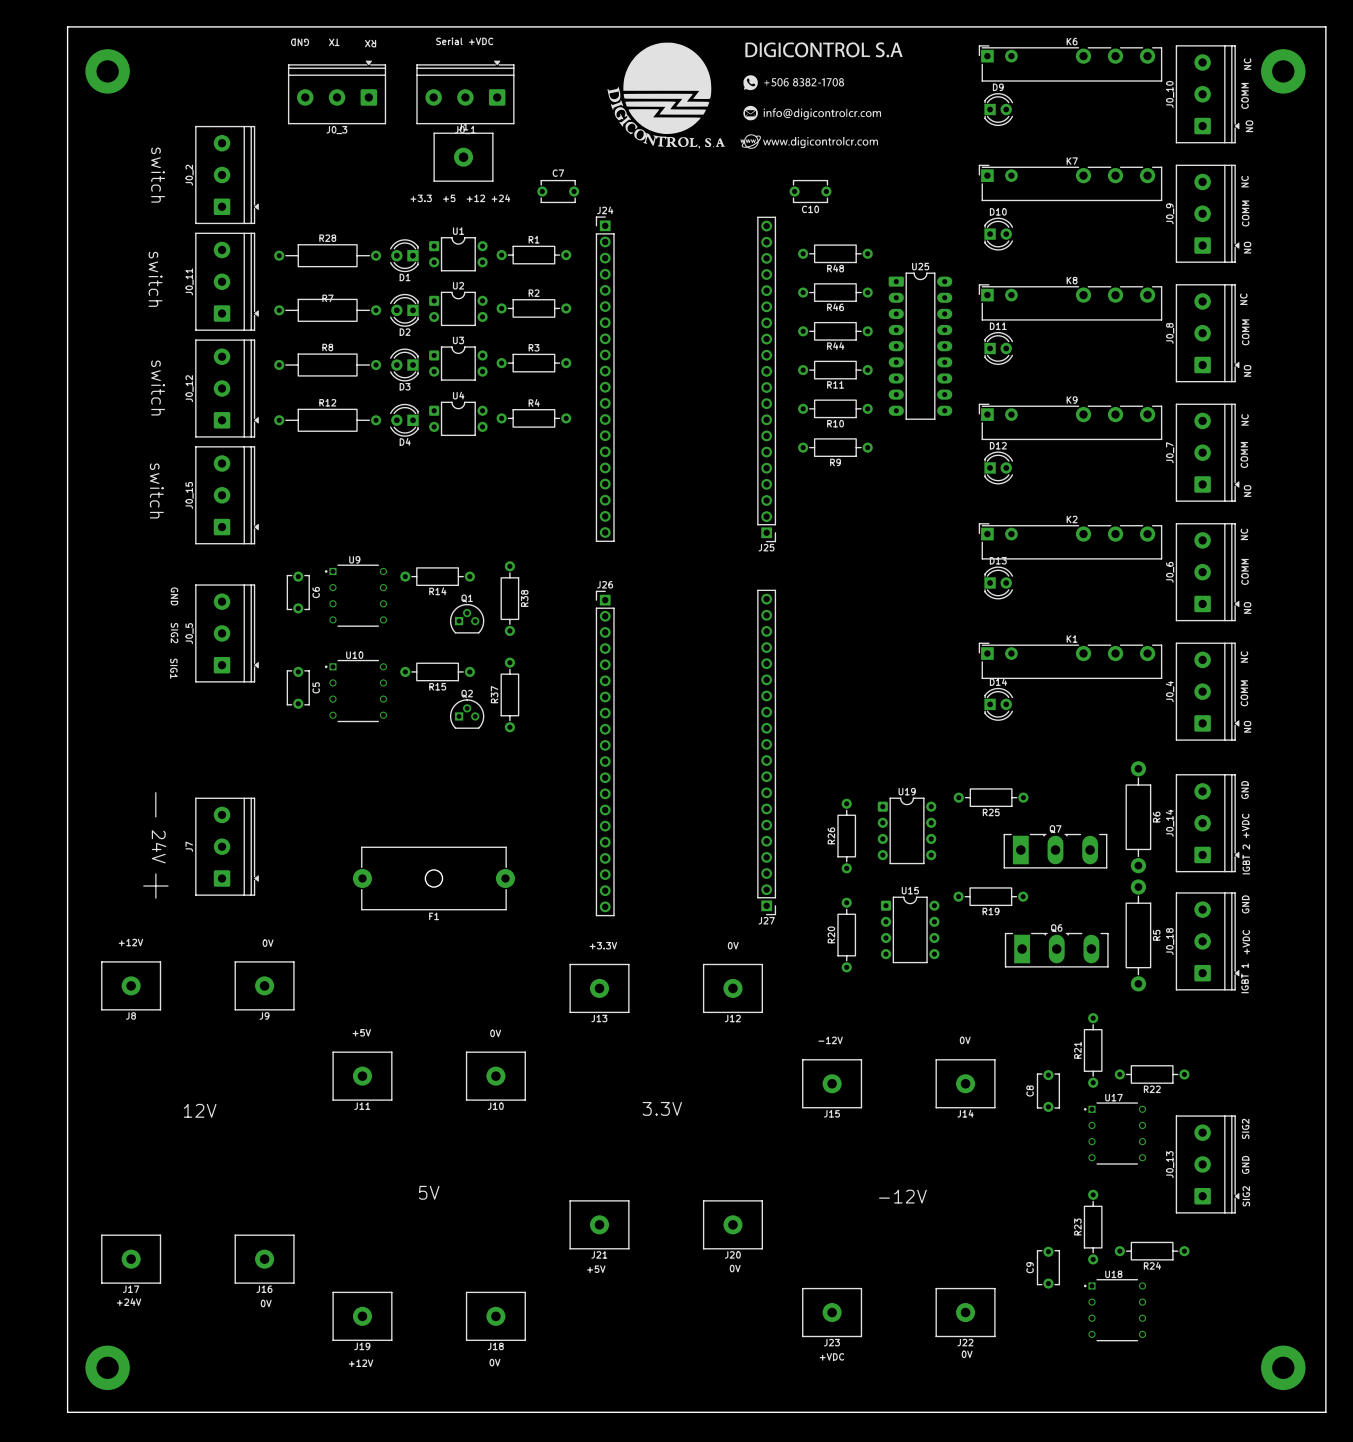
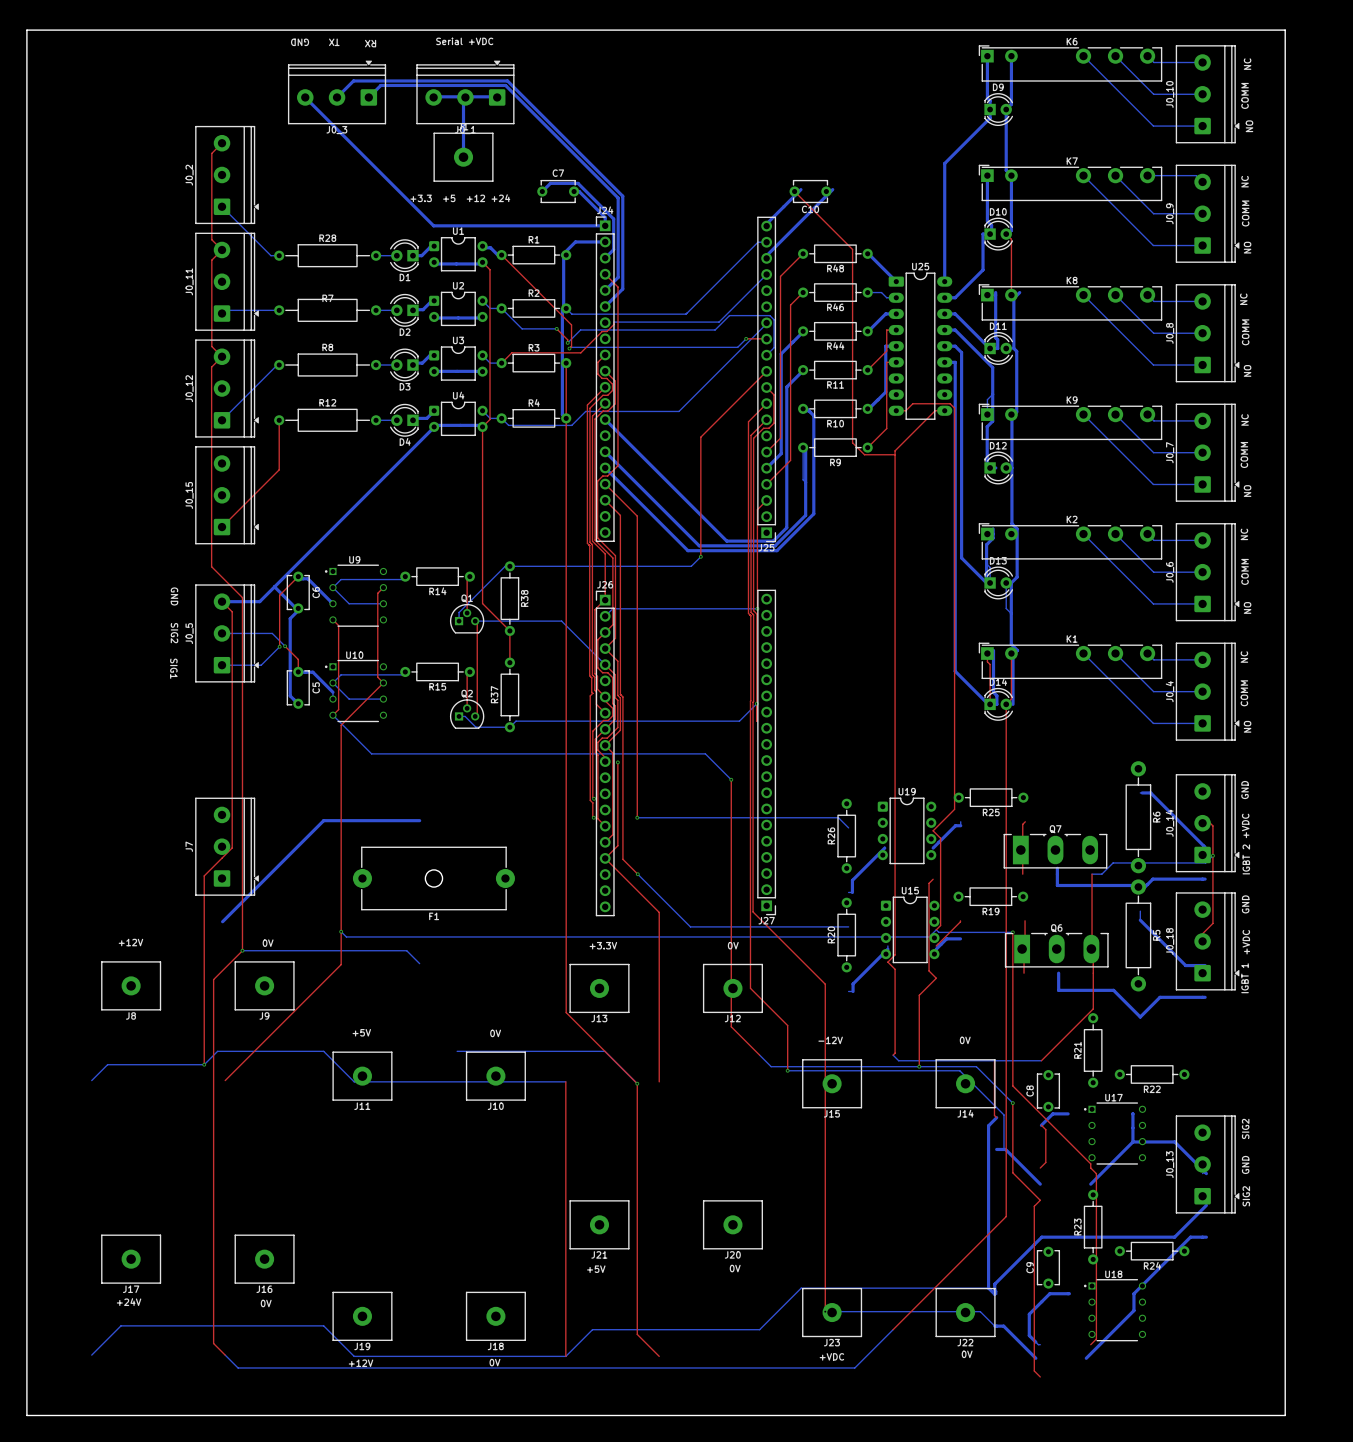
board edge: (67, 26) (1325, 26) (1325, 1412) (67, 1412) (67, 26) -> (26, 30) (1285, 30) (1285, 1415) (26, 1415) (26, 30)
drawing: [607, 42, 903, 149] -> none
bottom track: none -> (987, 56) (987, 98) (990, 100) (990, 118) (944, 163) (944, 281)
bottom track: none -> (1011, 56) (1011, 104) (1006, 109) (1006, 170) (1011, 175) (1011, 230) (1007, 234)
bottom track: none -> (1083, 56) (1153, 126) (1202, 126)
bottom track: none -> (1115, 56) (1153, 94) (1202, 94)
bottom track: none -> (1147, 56) (1153, 62) (1202, 62)
part: (107, 71) -> none
part: (1283, 71) -> none
bottom track: none -> (465, 96) (463, 98) (463, 157)
bottom track: none -> (305, 97) (433, 225) (605, 225) (605, 217) (579, 191) (574, 191)
bottom track: none -> (337, 97) (353, 80) (507, 80) (622, 196) (622, 288) (605, 306)
bottom track: none -> (368, 97) (380, 85) (505, 85) (618, 197) (618, 277) (605, 290)
bottom track: none -> (433, 97) (497, 97)
top track: none -> (222, 143) (211, 153) (211, 239) (222, 249) (211, 260) (211, 346) (222, 356) (211, 367) (211, 566) (242, 597) (242, 950) (213, 979) (213, 1343) (225, 1355)
text: switch (158, 175) -> none
bottom track: none -> (987, 175) (987, 221) (991, 225) (991, 234) (983, 234) (983, 269) (955, 297) (944, 297)
bottom track: none -> (1083, 175) (1153, 245) (1202, 245)
bottom track: none -> (1115, 175) (1153, 213) (1202, 213)
bottom track: none -> (1147, 175) (1196, 175) (1202, 181)
bottom track: none -> (800, 189) (766, 226)
bottom track: none -> (832, 189) (766, 255) (766, 258)
bottom track: none -> (542, 191) (550, 183) (578, 183) (613, 219) (613, 249) (605, 258)
top track: none -> (794, 191) (852, 249) (852, 442) (864, 454) (895, 454)
bottom track: none -> (222, 206) (270, 255) (279, 255)
top track: none -> (1006, 234) (1011, 239) (1011, 295)
bottom track: none -> (605, 241) (575, 241) (562, 255) (563, 256)
bottom track: none -> (766, 242) (758, 242) (686, 314) (571, 314) (563, 308)
bottom track: none -> (434, 246) (421, 255) (412, 255)
bottom track: none -> (480, 247) (490, 247) (497, 255)
top track: none -> (803, 253) (780, 276) (780, 438) (766, 452)
bottom track: none -> (867, 253) (896, 281)
bottom track: none -> (376, 255) (396, 255)
top track: none -> (501, 255) (571, 324) (571, 346) (569, 348)
bottom track: none -> (563, 256) (563, 308)
bottom track: none -> (482, 262) (480, 263) (432, 263)
top track: none -> (482, 262) (490, 269) (490, 419) (482, 426) (482, 603) (509, 630) (509, 662)
top track: none -> (605, 274) (617, 287) (617, 465) (607, 476) (602, 476) (597, 481) (597, 537) (615, 555) (615, 638) (605, 648) (617, 661) (617, 695) (620, 698) (620, 730) (605, 745) (612, 752) (612, 834) (605, 842)
bottom track: none -> (766, 274) (719, 322) (613, 322)
text: switch (155, 279) -> none
top track: none -> (803, 292) (790, 305) (790, 460) (766, 484)
bottom track: none -> (867, 292) (881, 292) (886, 297) (896, 297)
bottom track: none -> (995, 292) (995, 337) (997, 339) (997, 348) (989, 348)
bottom track: none -> (1019, 292) (1013, 298) (1013, 348)
bottom track: none -> (1083, 295) (1153, 365) (1202, 365)
bottom track: none -> (1115, 295) (1153, 333) (1202, 333)
bottom track: none -> (1147, 295) (1153, 301) (1202, 301)
bottom track: none -> (434, 300) (423, 309) (412, 310)
bottom track: none -> (482, 300) (490, 308) (501, 308) (522, 328) (557, 329)
bottom track: none -> (563, 308) (562, 414) (566, 418)
bottom track: none -> (279, 310) (225, 310) (222, 313)
bottom track: none -> (376, 310) (396, 310)
bottom track: none -> (896, 313) (885, 313) (867, 331)
bottom track: none -> (944, 313) (955, 313) (989, 348)
bottom track: none -> (434, 316) (482, 317)
top track: none -> (613, 322) (606, 331) (602, 331) (580, 352) (511, 352) (501, 363)
bottom track: none -> (766, 322) (678, 411) (585, 411) (571, 425) (508, 425) (501, 418) (490, 418) (482, 410)
top track: none -> (556, 328) (567, 339) (567, 342)
via: none -> (556, 328)
bottom track: none -> (804, 330) (781, 353) (781, 453) (766, 468)
top track: none -> (896, 330) (886, 330) (886, 351) (867, 370)
bottom track: none -> (944, 330) (955, 330) (992, 367) (992, 421) (987, 426) (987, 467) (995, 467)
bottom track: none -> (746, 338) (737, 347) (569, 348)
top track: none -> (746, 338) (766, 339)
via: none -> (746, 338)
bottom track: none -> (567, 342) (580, 330) (715, 330) (729, 315) (769, 315) (774, 319) (774, 347) (766, 355)
via: none -> (567, 342)
bottom track: none -> (896, 346) (885, 346) (885, 392) (870, 407)
bottom track: none -> (944, 346) (955, 346) (961, 352) (961, 558) (986, 582) (986, 544) (993, 538) (993, 528)
via: none -> (569, 348)
bottom track: none -> (1013, 348) (1016, 351) (1016, 412) (1011, 416) (1011, 523) (1017, 528) (1017, 577) (1011, 582) (1011, 644) (1017, 650) (1013, 654)
top track: none -> (605, 354) (597, 362) (597, 374) (612, 384) (612, 390) (607, 395) (602, 395) (589, 408) (592, 674) (594, 677) (596, 704) (605, 713)
bottom track: none -> (434, 355) (430, 355) (422, 363) (413, 363) (412, 365)
bottom track: none -> (482, 355) (490, 363) (501, 363)
top track: none -> (896, 362) (886, 362) (886, 428) (867, 447)
bottom track: none -> (944, 362) (955, 362) (955, 671) (988, 704) (996, 704) (996, 695) (993, 692) (993, 650)
top track: none -> (566, 363) (566, 1012) (637, 1083) (637, 1334) (659, 1356)
bottom track: none -> (279, 365) (222, 420)
bottom track: none -> (376, 365) (396, 365)
bottom track: none -> (805, 368) (786, 387) (786, 527) (773, 541) (726, 541) (605, 419)
bottom track: none -> (432, 371) (482, 371)
top track: none -> (605, 371) (615, 381) (615, 403) (608, 411) (603, 411) (595, 419) (595, 540) (612, 557) (612, 624) (597, 639) (597, 667) (612, 677) (612, 703) (615, 706) (615, 719) (595, 739) (595, 752) (597, 755) (597, 818) (605, 826)
top track: none -> (766, 371) (700, 437) (700, 556)
text: switch (158, 387) -> none
top track: none -> (605, 387) (587, 405) (589, 675) (591, 677) (592, 693) (590, 695) (590, 800) (592, 802) (593, 817)
top track: none -> (766, 387) (774, 394) (774, 423) (768, 428) (763, 428) (753, 438) (753, 610) (756, 613) (756, 721)
bottom track: none -> (992, 394) (987, 399) (987, 414)
top track: none -> (605, 403) (592, 416) (592, 541) (605, 553) (605, 600)
top track: none -> (766, 403) (748, 421) (748, 613) (750, 615) (750, 988) (787, 1025) (787, 1070)
bottom track: none -> (805, 407) (813, 415) (813, 513) (776, 550) (687, 550) (605, 467)
bottom track: none -> (436, 409) (426, 418) (414, 418) (412, 420)
top track: none -> (896, 410) (905, 410) (912, 403) (950, 403) (954, 408) (954, 809) (933, 830) (940, 838) (940, 925) (936, 929)
top track: none -> (944, 410) (935, 410) (895, 450) (895, 954) (887, 962) (895, 969) (895, 1053) (893, 1055)
bottom track: none -> (1083, 414) (1153, 484) (1202, 484)
bottom track: none -> (1115, 414) (1153, 452) (1202, 452)
bottom track: none -> (1147, 414) (1153, 420) (1202, 420)
top track: none -> (766, 419) (751, 435) (751, 612) (753, 614) (753, 911) (825, 984) (825, 1311)
top track: none -> (279, 420) (279, 469) (222, 527)
bottom track: none -> (376, 420) (396, 420)
bottom track: none -> (436, 425) (484, 425)
bottom track: none -> (436, 425) (259, 601) (222, 601)
bottom track: none -> (803, 447) (803, 479) (805, 482)
bottom track: none -> (805, 449) (805, 515) (775, 545) (699, 545) (605, 451)
top track: none -> (605, 484) (637, 516) (637, 817)
text: switch (156, 490) -> none
top track: none -> (605, 500) (620, 515) (622, 859) (637, 874)
top track: none -> (766, 500) (757, 509) (757, 608)
bottom track: none -> (1083, 534) (1153, 603) (1202, 603)
bottom track: none -> (1115, 534) (1153, 572) (1202, 572)
bottom track: none -> (1147, 534) (1153, 540) (1202, 540)
bottom track: none -> (700, 556) (691, 566) (505, 566) (459, 612) (459, 621)
via: none -> (700, 556)
bottom track: none -> (986, 563) (990, 567) (990, 582)
top track: none -> (298, 576) (279, 595) (279, 646)
bottom track: none -> (405, 576) (402, 579) (341, 579) (332, 587) (349, 603) (383, 603)
top track: none -> (469, 576) (467, 579) (467, 613)
bottom track: none -> (298, 578) (307, 578) (332, 603)
bottom track: none -> (1006, 582) (1006, 608) (1011, 613)
bottom track: none -> (274, 586) (298, 610) (290, 618) (290, 695) (298, 703)
top track: none -> (383, 587) (377, 593) (377, 677) (383, 682) (341, 725) (341, 964) (225, 1080)
top track: none -> (605, 599) (594, 609) (594, 673) (597, 676) (597, 689) (612, 708) (612, 715) (608, 720) (603, 720) (592, 731) (594, 798)
top track: none -> (222, 601) (232, 611) (232, 847) (204, 875) (204, 1064)
bottom track: none -> (757, 608) (612, 608) (605, 616)
via: none -> (757, 608)
top track: none -> (332, 619) (338, 625) (338, 709) (332, 715)
bottom track: none -> (475, 621) (561, 621) (605, 664)
top track: none -> (475, 621) (477, 623) (477, 714) (475, 716)
bottom track: none -> (222, 633) (272, 633) (285, 646)
bottom track: none -> (279, 646) (261, 665) (222, 665)
via: none -> (279, 646)
top track: none -> (285, 646) (298, 659) (298, 671)
via: none -> (285, 646)
top track: none -> (987, 653) (987, 661) (990, 664) (990, 704)
top track: none -> (1011, 653) (1011, 699) (1006, 704) (1006, 1216) (893, 1329)
bottom track: none -> (1083, 653) (1153, 723) (1202, 723)
bottom track: none -> (1115, 653) (1153, 691) (1202, 691)
bottom track: none -> (1147, 653) (1153, 659) (1202, 659)
bottom track: none -> (1013, 654) (1013, 704)
top track: none -> (605, 664) (615, 674) (615, 697) (617, 700) (617, 727) (607, 738) (602, 738) (597, 742) (597, 750) (605, 757) (605, 761)
bottom track: none -> (405, 671) (402, 674) (341, 674) (332, 682) (349, 699) (383, 699)
top track: none -> (469, 671) (467, 674) (467, 708)
bottom track: none -> (298, 672) (312, 672) (332, 692) (332, 699)
via: none -> (756, 703)
bottom track: none -> (332, 715) (371, 753) (705, 753) (731, 779)
bottom track: none -> (459, 716) (465, 716) (475, 727) (509, 727) (515, 721) (739, 721) (756, 703) (756, 721)
top track: none -> (617, 762) (617, 845) (605, 858) (659, 912) (659, 1081)
via: none -> (617, 762)
top track: none -> (731, 779) (731, 1026) (759, 1055)
via: none -> (731, 779)
bottom track: none -> (1140, 792) (1150, 792) (1205, 847)
via: none -> (594, 798)
text: - (155, 804) -> none
top track: none -> (1202, 815) (1212, 825) (1212, 923) (1202, 933)
via: none -> (593, 817)
bottom track: none -> (637, 817) (838, 817) (848, 827)
via: none -> (637, 817)
bottom track: none -> (419, 820) (323, 820) (222, 921)
bottom track: none -> (960, 821) (960, 825) (955, 825) (933, 848)
top track: none -> (1025, 821) (1022, 824) (1022, 874)
text: 24V (159, 846) -> none
bottom track: none -> (884, 846) (852, 880) (852, 892) (848, 892)
bottom track: none -> (1212, 855) (1205, 862) (1113, 862) (1101, 874) (1092, 874)
via: none -> (1212, 855)
bottom track: none -> (1057, 868) (1057, 885) (1137, 885) (1142, 889) (1152, 879) (1205, 879)
bottom track: none -> (637, 874) (690, 926) (848, 926)
via: none -> (637, 874)
top track: none -> (1092, 874) (1093, 1008) (1041, 1060)
top track: none -> (933, 879) (929, 883) (929, 970) (936, 978) (919, 995) (919, 1066)
text: + (155, 886) -> none
bottom track: none -> (1140, 911) (1140, 920) (1185, 965) (1205, 965)
top track: none -> (960, 920) (936, 945)
top track: none -> (1025, 920) (1024, 973)
bottom track: none -> (341, 931) (346, 936) (929, 936) (936, 929) (938, 932) (1012, 932)
via: none -> (341, 931)
top track: none -> (1012, 932) (1012, 1085) (1090, 1163) (1090, 1168) (1096, 1173) (1096, 1339) (1090, 1344)
via: none -> (1012, 932)
bottom track: none -> (960, 938) (946, 938) (936, 949)
bottom track: none -> (887, 945) (887, 949) (853, 983) (853, 991) (848, 991)
bottom track: none -> (242, 950) (406, 950) (419, 963)
via: none -> (242, 950)
bottom track: none -> (1058, 973) (1058, 990) (1113, 990) (1140, 1017) (1160, 997) (1205, 997)
bottom track: none -> (457, 1051) (604, 1051) (637, 1083)
bottom track: none -> (759, 1055) (771, 1066) (976, 1066) (1012, 1103)
bottom track: none -> (893, 1055) (898, 1060) (1041, 1060)
top track: none -> (994, 1060) (994, 1115) (996, 1117)
via: none -> (204, 1064)
via: none -> (919, 1066)
bottom track: none -> (787, 1070) (959, 1070) (1004, 1114) (1004, 1149)
via: none -> (787, 1070)
bottom track: none -> (91, 1080) (107, 1064) (204, 1064) (217, 1051) (323, 1051) (354, 1081) (565, 1081)
top track: none -> (565, 1081) (565, 1356)
via: none -> (637, 1083)
top track: none -> (1012, 1103) (1012, 1172) (1040, 1200) (1034, 1206) (1034, 1370) (1040, 1376)
via: none -> (1012, 1103)
text: 3.3V (662, 1108) -> none
text: 12V (200, 1110) -> none
bottom track: none -> (1068, 1113) (1052, 1113) (1041, 1125)
bottom track: none -> (1132, 1113) (1132, 1141)
bottom track: none -> (996, 1117) (988, 1125) (988, 1288)
top track: none -> (1041, 1125) (1045, 1129) (1045, 1162) (1040, 1168)
bottom track: none -> (1132, 1141) (1174, 1141) (1206, 1173)
bottom track: none -> (1132, 1141) (1090, 1184)
bottom track: none -> (996, 1149) (1005, 1149) (1040, 1184)
bottom track: none -> (1204, 1171) (1202, 1173)
text: 5V (429, 1192) -> none
text: -12V (902, 1196) -> none
bottom track: none -> (1206, 1205) (1174, 1237) (1041, 1237) (994, 1284) (994, 1294) (988, 1288)
bottom track: none -> (1206, 1237) (1190, 1237) (1133, 1293)
bottom track: none -> (988, 1288) (801, 1288) (759, 1329) (592, 1329) (565, 1356) (354, 1356) (323, 1325) (120, 1325) (91, 1355)
bottom track: none -> (994, 1289) (996, 1294)
bottom track: none -> (1069, 1293) (1049, 1293) (1029, 1314) (1029, 1335) (1040, 1344)
bottom track: none -> (1133, 1293) (1133, 1310) (1086, 1358)
bottom track: none -> (825, 1311) (980, 1311) (994, 1326) (1003, 1326) (1035, 1358)
bottom track: none -> (893, 1329) (854, 1367) (238, 1367) (225, 1355)
part: (107, 1367) -> none
part: (1283, 1367) -> none

